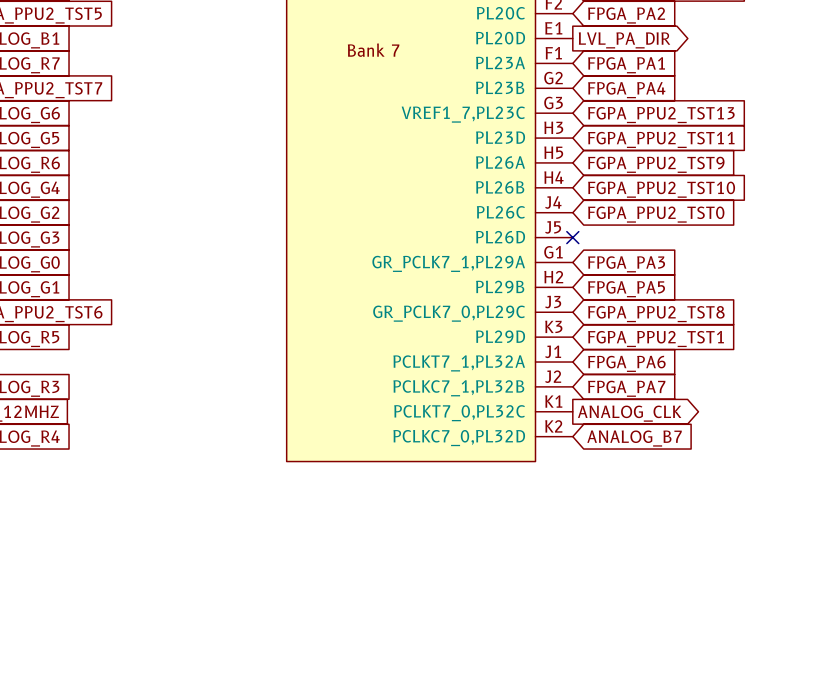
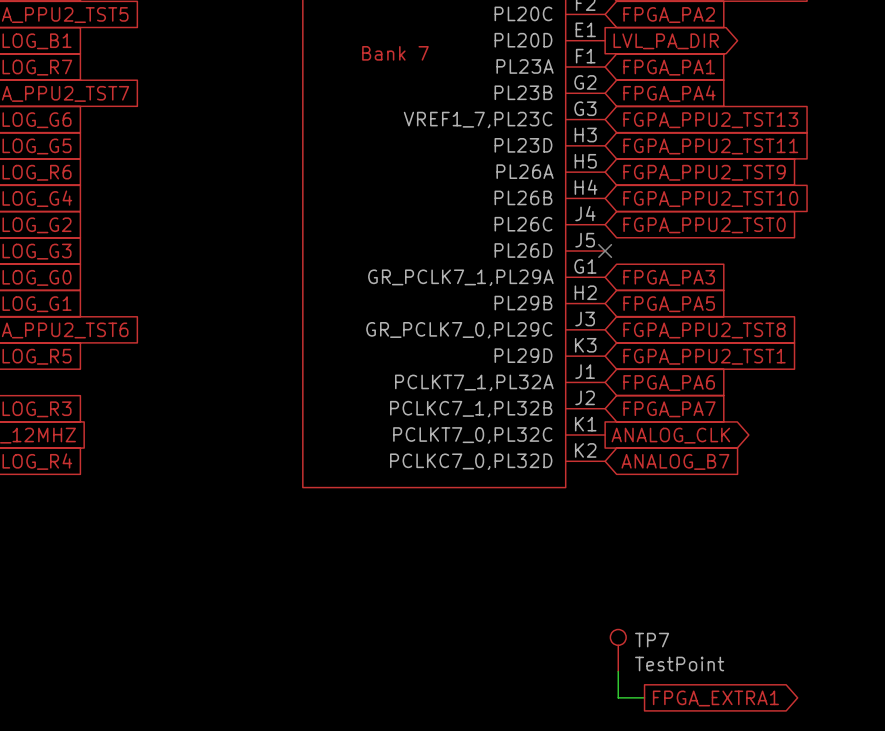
TP7: none -> TestPoint (618, 650)
wire: none -> (618, 671) (618, 697) (644, 697)
global label: none -> FPGA_EXTRA1 (715, 698)

